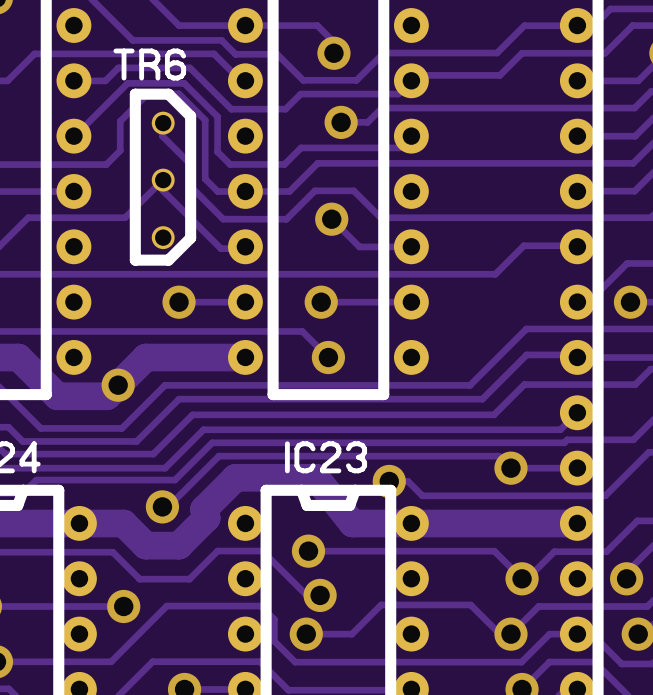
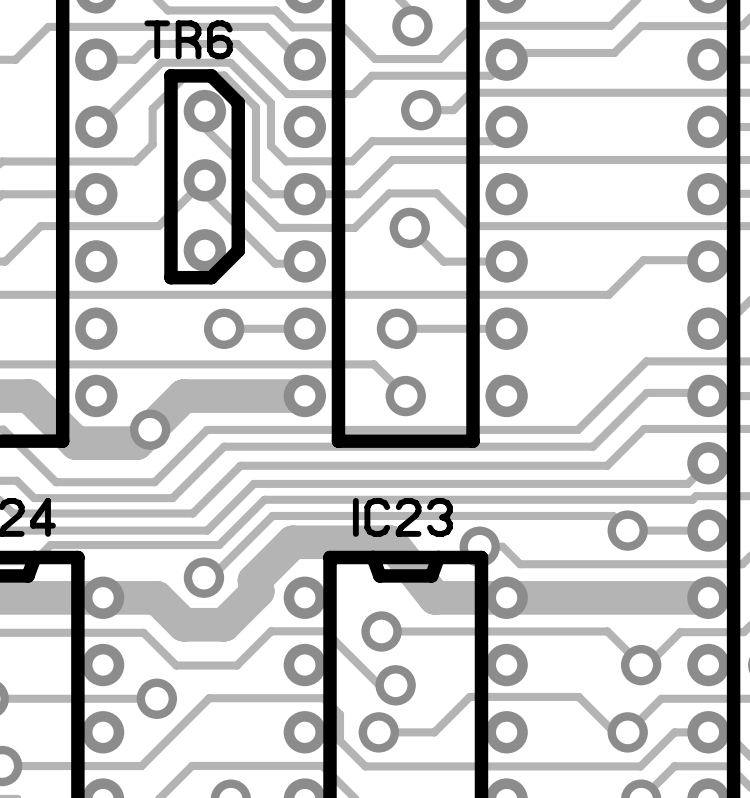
part footprint: [151, 111, 175, 250] -> [183, 89, 227, 272]

